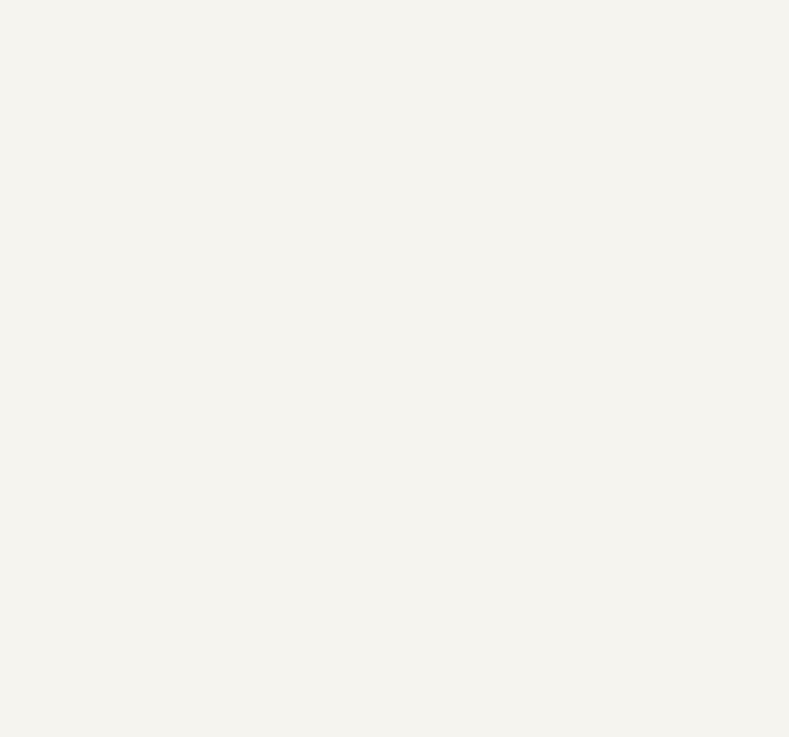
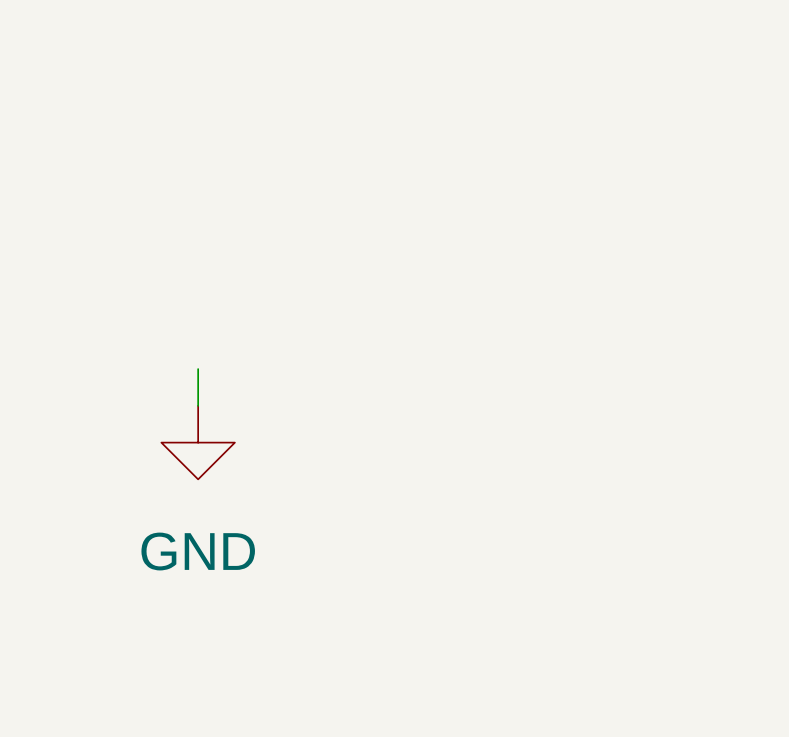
wire: none -> (198, 369) (198, 405)
power symbol: none -> GND (198, 442)

